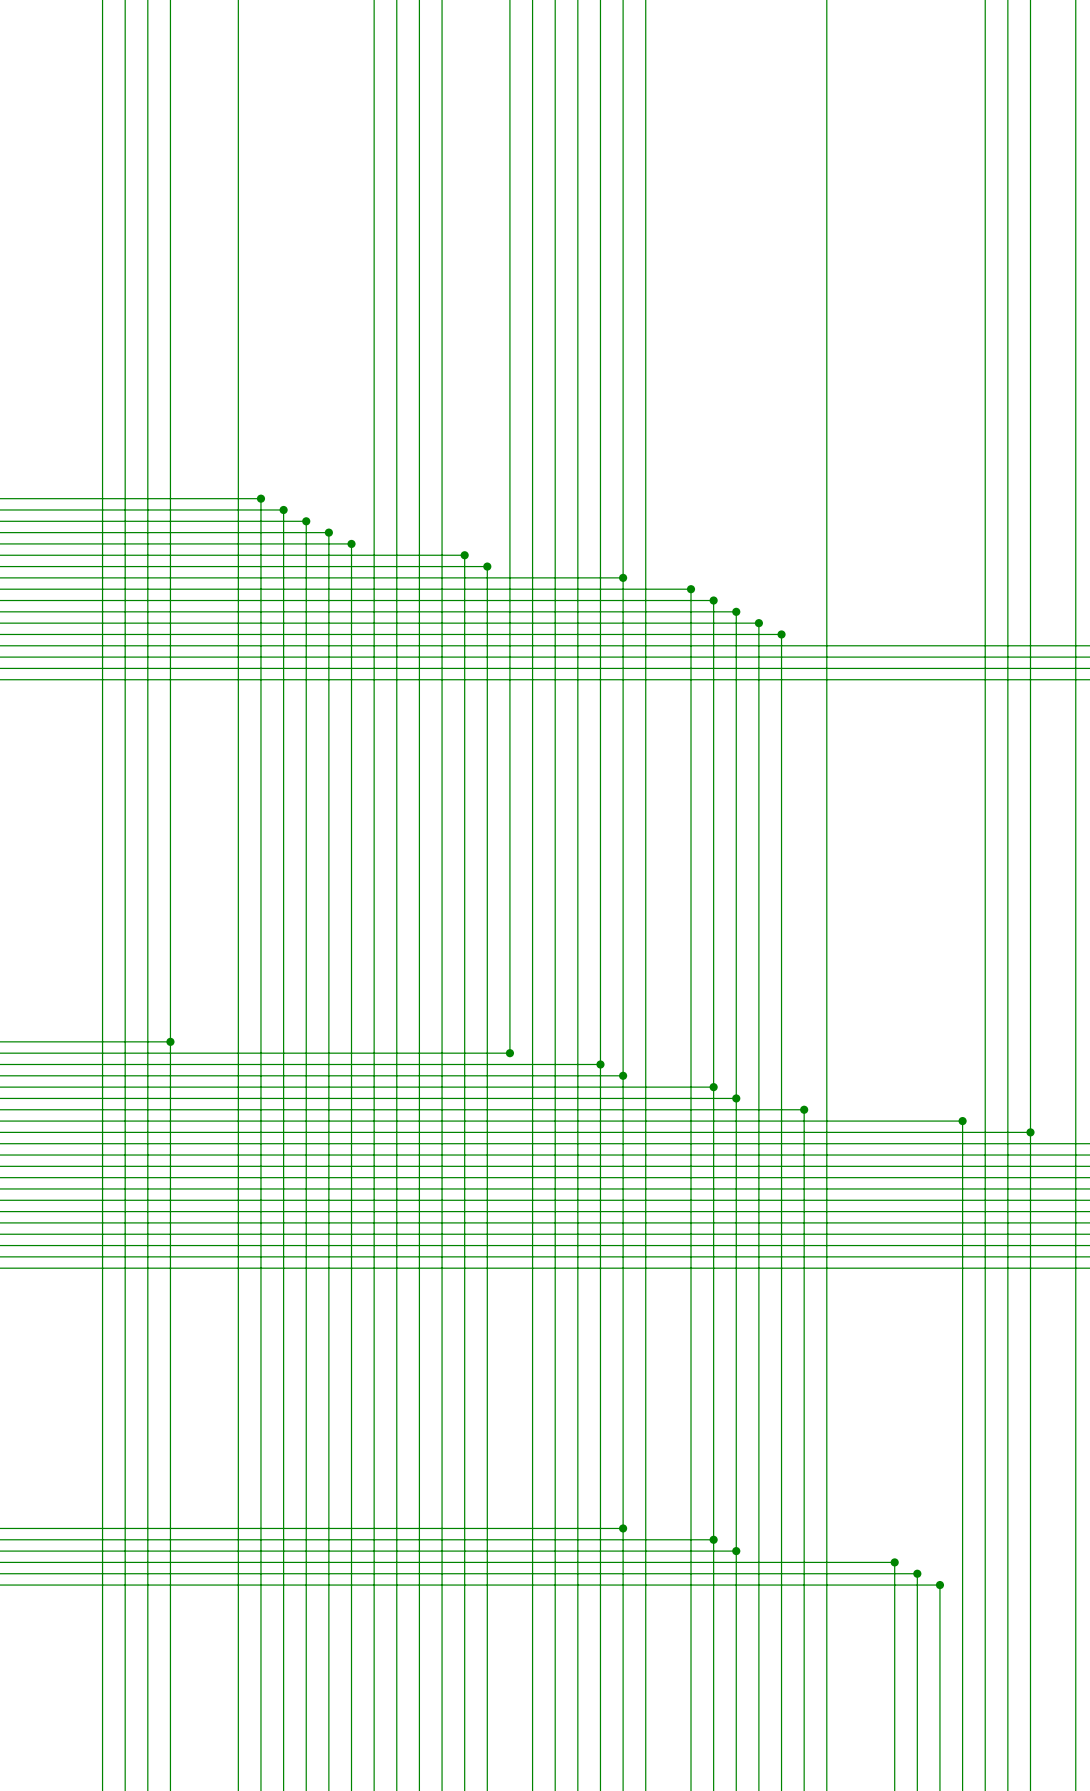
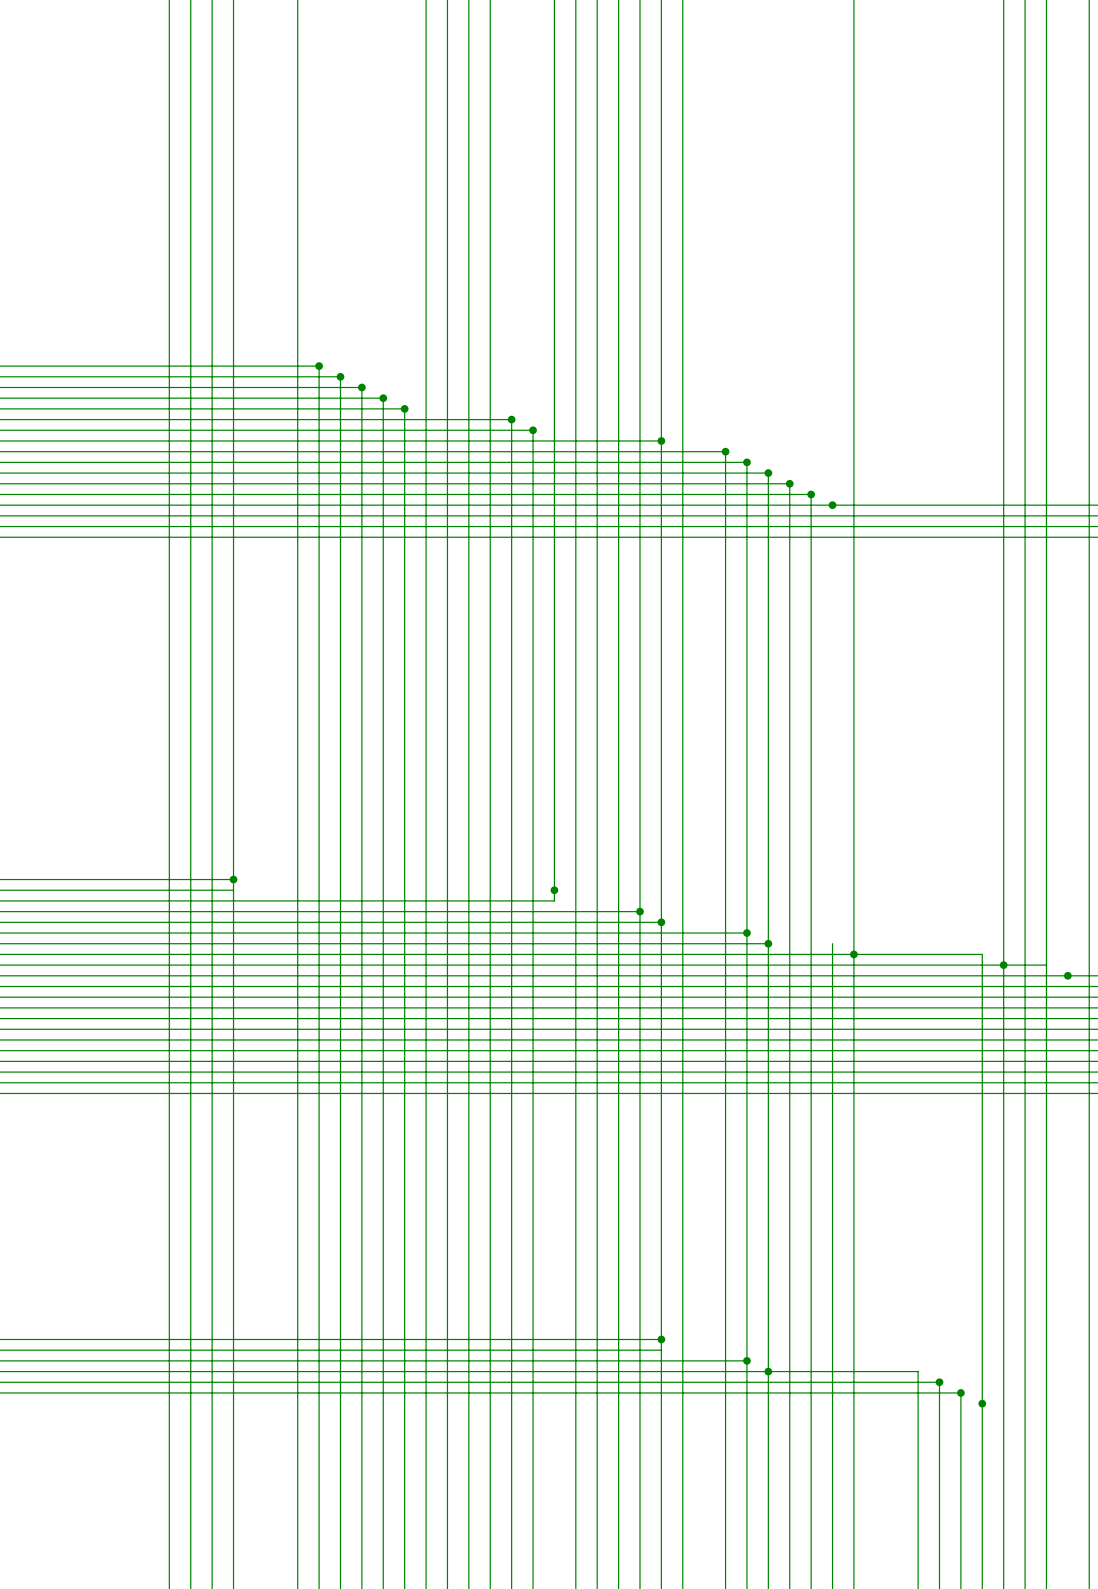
junction: none -> (832, 505)
wire: (170, 1053) (509, 1053) -> none
wire: (509, 1064) (600, 1064) -> (554, 900) (554, 890)
junction: (600, 1064) -> none
wire: (600, 1075) (623, 1075) -> none
junction: none -> (639, 911)
junction: (623, 1075) -> none
wire: (623, 1087) (713, 1087) -> none
junction: none -> (661, 922)
junction: (713, 1087) -> none
wire: (713, 1098) (736, 1098) -> none
junction: none -> (746, 933)
junction: (736, 1098) -> none
wire: (736, 1109) (804, 1109) -> none
junction: none -> (768, 943)
junction position: (804, 1109) -> (853, 954)
junction: (962, 1121) -> none
junction: none -> (1003, 965)
junction: (1030, 1132) -> none
junction: none -> (1067, 975)
wire: (623, 1539) (713, 1539) -> none
junction: (713, 1539) -> none
wire: (713, 1551) (736, 1551) -> none
junction: none -> (746, 1360)
junction: (736, 1551) -> none
junction: none -> (768, 1371)
junction: (894, 1562) -> none
junction: none -> (982, 1403)

